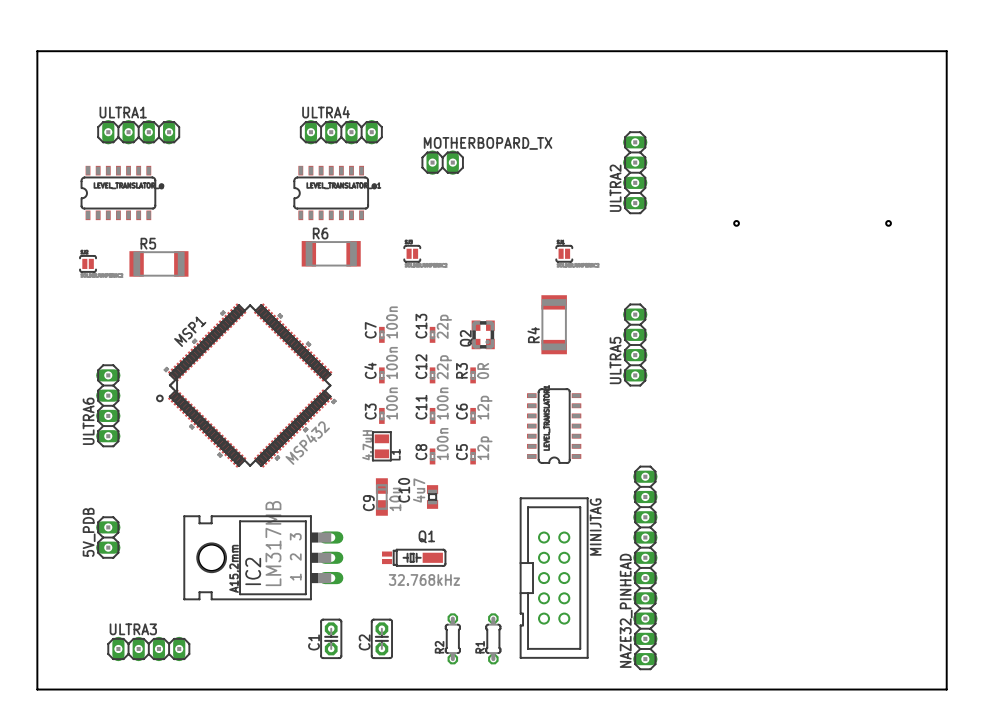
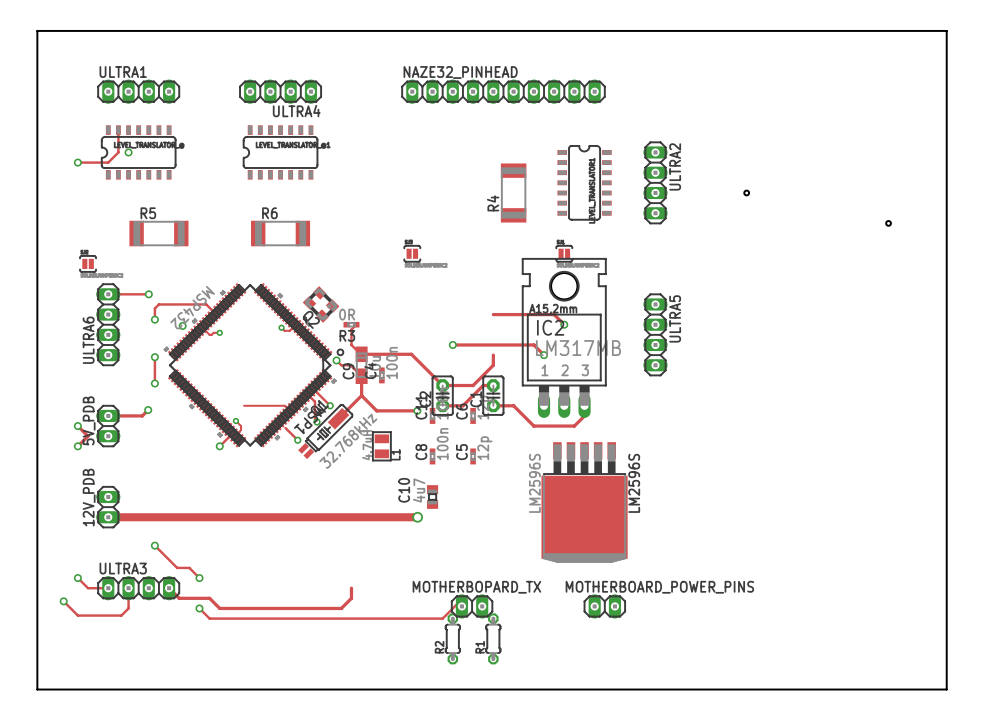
board edge: (37, 51) (946, 51) -> (37, 51) (37, 30) (946, 30) (946, 51)
ULTRA4 name position: ULTRA4 (326, 112) -> ULTRA4 (296, 111)
track: none -> (118, 130) (118, 152) (108, 162) (77, 162)
ULTRA1 position: (138, 132) -> (138, 91)
ULTRA4 position: (341, 132) -> (280, 91)
via: none -> (128, 152)
via: none -> (77, 162)
MOTHERBOPARD_TX: (442, 162) -> none
ULTRA2 position: (635, 172) -> (655, 182)
ULTRA2 name position: ULTRA2 (615, 188) -> ULTRA2 (675, 166)
part position: (118, 192) -> (138, 152)
part position: (331, 192) -> (280, 152)
hole position: (736, 223) -> (746, 192)
R6 position: (331, 253) -> (280, 233)
R5 position: (158, 263) -> (158, 233)
track: none -> (108, 294) (148, 294)
via: none -> (148, 294)
track: none -> (215, 313) (206, 304) (158, 304) (154, 308) (154, 319)
track: none -> (493, 314) (554, 314) (564, 324)
via: none -> (154, 319)
track: none -> (356, 324) (351, 329) (351, 344) (360, 354) (411, 354) (442, 385) (473, 385) (493, 365) (493, 355)
R4 position: (554, 324) -> (513, 192)
via: none -> (564, 324)
via: none -> (182, 325)
track: none -> (296, 325) (289, 330) (284, 330) (281, 327)
track: none -> (201, 327) (209, 334) (219, 332)
via: none -> (281, 327)
via: none -> (219, 332)
C7: 100n (381, 334) -> none
C13: 22p (432, 334) -> none
Q2 rotation: 0° (483, 334) -> 45° counterclockwise (321, 304)
Q2 position: (483, 334) -> (321, 304)
track: none -> (452, 344) (533, 344) (544, 355)
via: none -> (452, 344)
ULTRA5 position: (635, 344) -> (655, 334)
via: none -> (544, 355)
track: none -> (154, 357) (154, 383)
via: none -> (154, 357)
track: none -> (336, 360) (341, 365) (350, 365) (361, 376) (361, 395)
via: none -> (336, 360)
ULTRA5 name position: ULTRA5 (615, 360) -> ULTRA5 (675, 318)
R3 name position: R3 (461, 370) -> R3 (347, 335)
R3 value position: 0R (483, 371) -> 0R (347, 314)
C12: 22p (432, 375) -> none
R3 rotation: 0° (473, 375) -> 90° clockwise (351, 324)
R3 position: (473, 375) -> (351, 324)
via: none -> (154, 383)
MSP1 rotation: 0° (246, 385) -> 180° (253, 365)
track: none -> (493, 385) (483, 385) (462, 405) (442, 405)
track: none -> (312, 388) (330, 405)
track: none -> (307, 394) (315, 401) (315, 419) (317, 422)
track: none -> (361, 395) (376, 410) (417, 410)
track: none -> (361, 395) (338, 418)
ULTRA6 position: (108, 405) -> (108, 324)
track: none -> (244, 405) (284, 405) (290, 411)
via: none -> (330, 405)
track: none -> (493, 405) (513, 405) (533, 426) (574, 426) (584, 415) (584, 405)
track: none -> (148, 410) (142, 415) (108, 415)
via: none -> (148, 410)
via: none -> (417, 410)
C3: 100n (381, 415) -> none
track: none -> (235, 420) (241, 426) (241, 430) (235, 436)
via: none -> (235, 420)
via: none -> (317, 422)
track: none -> (77, 426) (88, 436) (77, 446)
via: none -> (77, 426)
part rotation: 0° (554, 426) -> 180° (584, 182)
part position: (554, 426) -> (584, 182)
track: none -> (285, 428) (297, 440)
track: none -> (232, 433) (219, 446)
via: none -> (297, 440)
via: none -> (77, 446)
via: none -> (219, 446)
C9 position: (381, 496) -> (361, 365)
LM2596S: none -> LM2596S (584, 502)
12V_PDB: none -> (108, 507)
track: none -> (108, 517) (417, 517)
via: none -> (417, 517)
5V_PDB position: (108, 537) -> (108, 426)
track: none -> (154, 545) (177, 567) (189, 567) (199, 578)
via: none -> (154, 545)
IC2 rotation: 0° (263, 557) -> 90° clockwise (564, 338)
IC2 position: (263, 557) -> (564, 338)
Q1 rotation: 0° (414, 557) -> 45° counterclockwise (325, 431)
Q1 position: (414, 557) -> (325, 431)
NAZE32_PINHEAD rotation: 0° (645, 567) -> 90° clockwise (503, 91)
NAZE32_PINHEAD position: (645, 567) -> (503, 91)
track: none -> (77, 578) (88, 588) (108, 588)
via: none -> (77, 578)
via: none -> (199, 578)
MINIJTAG: (554, 578) -> none
track: none -> (128, 588) (128, 608) (121, 615) (77, 615) (63, 601)
track: none -> (169, 588) (179, 598) (209, 598) (219, 608) (341, 608) (351, 598) (351, 588)
via: none -> (63, 601)
track: none -> (461, 606) (461, 599) (442, 618) (209, 618) (199, 608)
MOTHERBOPARD_TX: none -> (472, 606)
MOTHERBOARD_POWER_PINS: none -> (604, 606)
via: none -> (199, 608)
C1 position: (331, 638) -> (493, 395)
C2 position: (381, 638) -> (442, 395)
ULTRA3 position: (148, 648) -> (138, 588)

